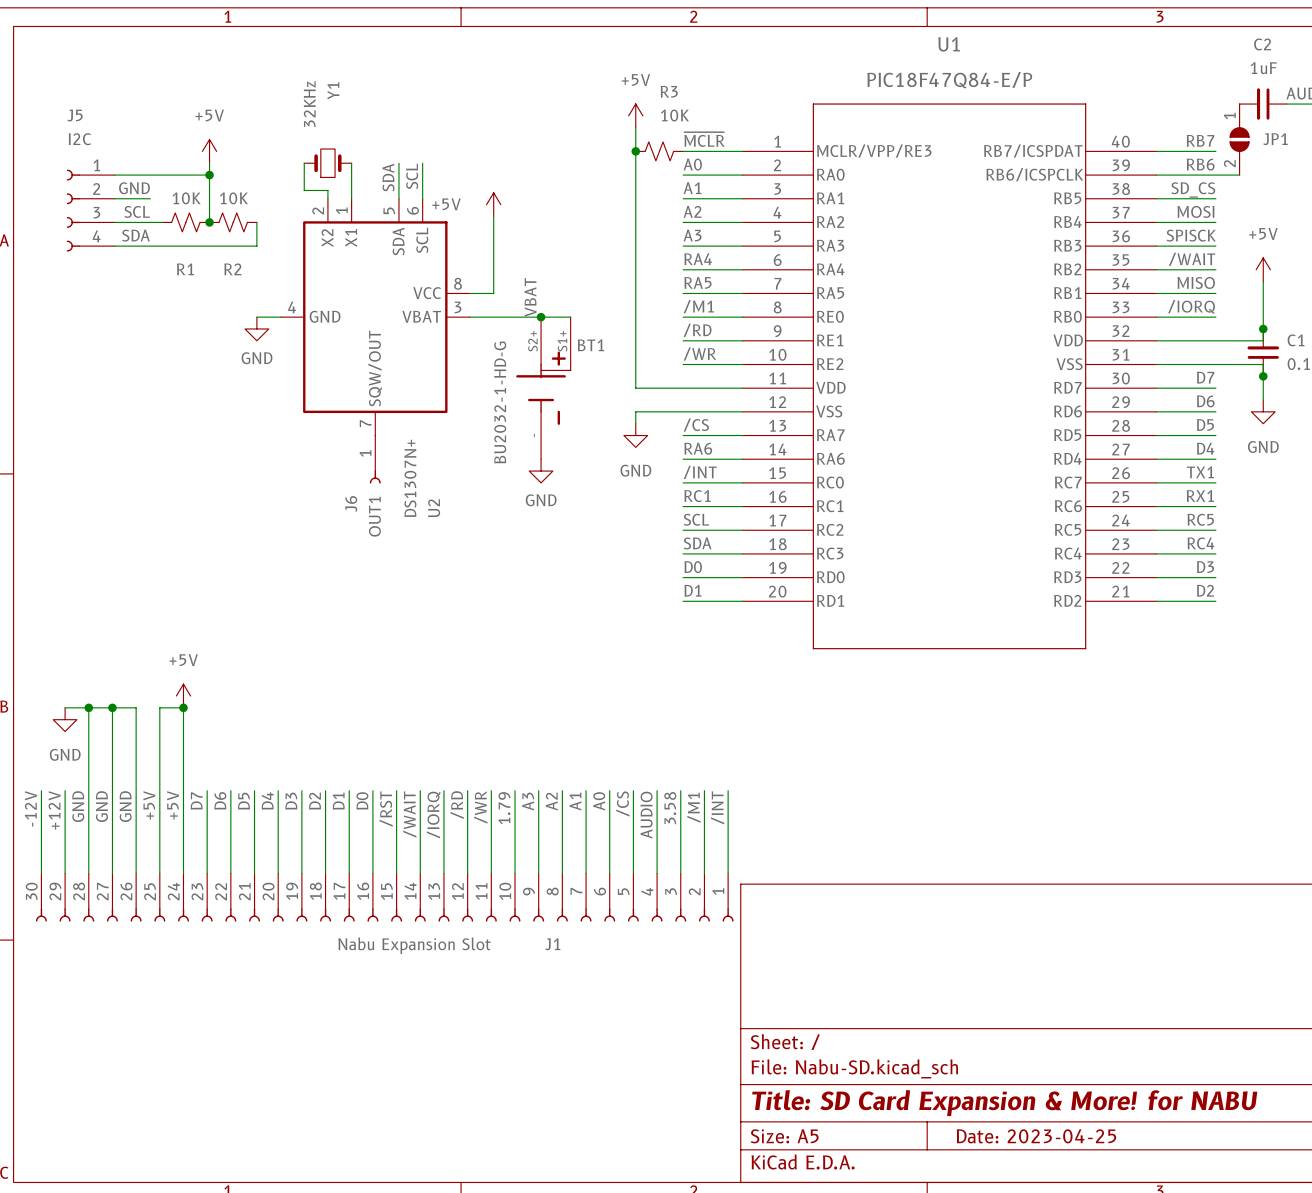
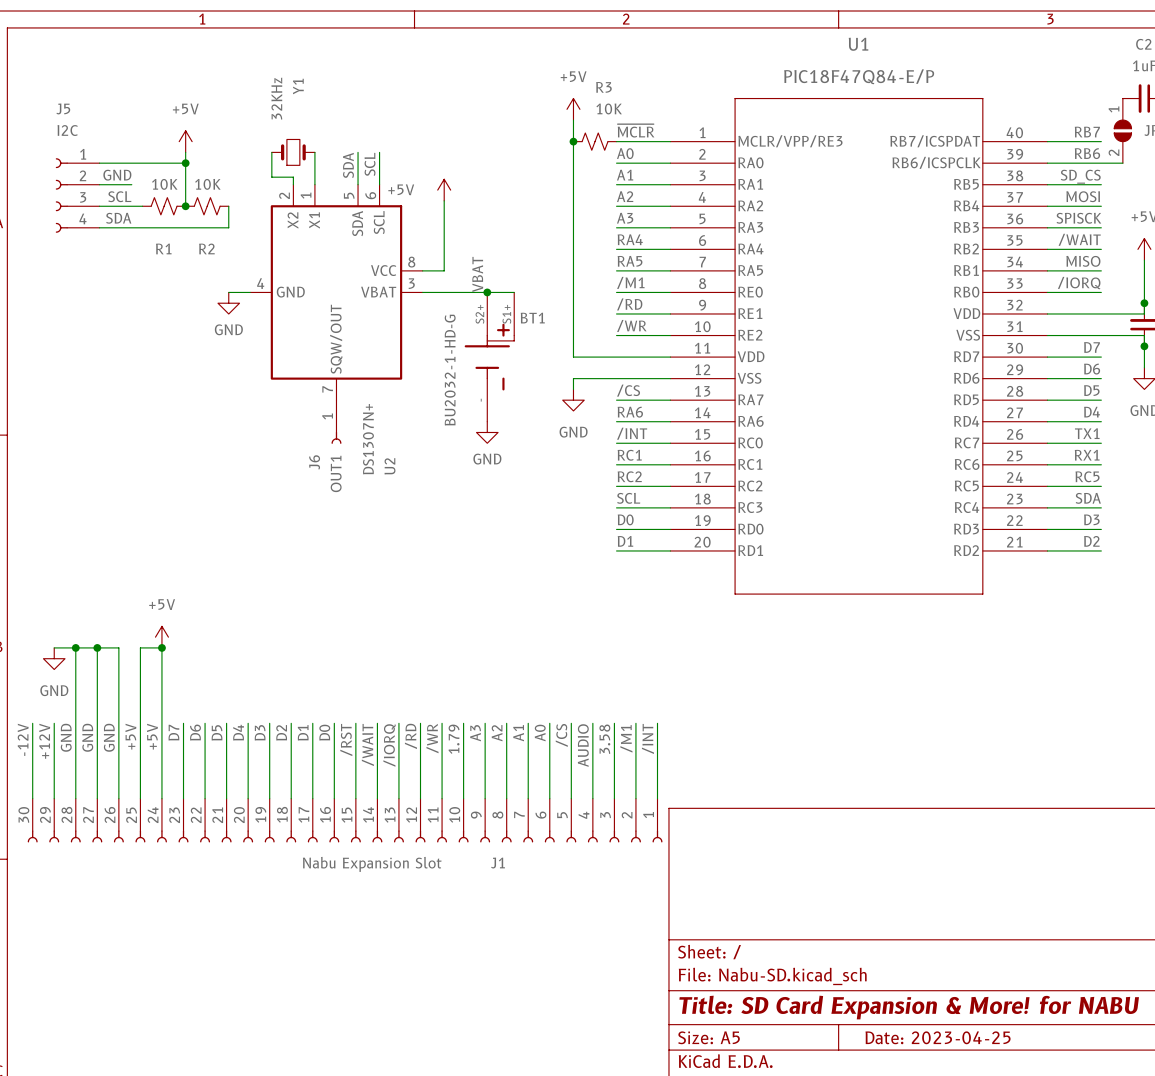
label: SCL (696, 519) -> RC2 (629, 476)
label: SDA (697, 543) -> SCL (628, 498)
label: RC4 (1200, 543) -> SDA (1088, 498)

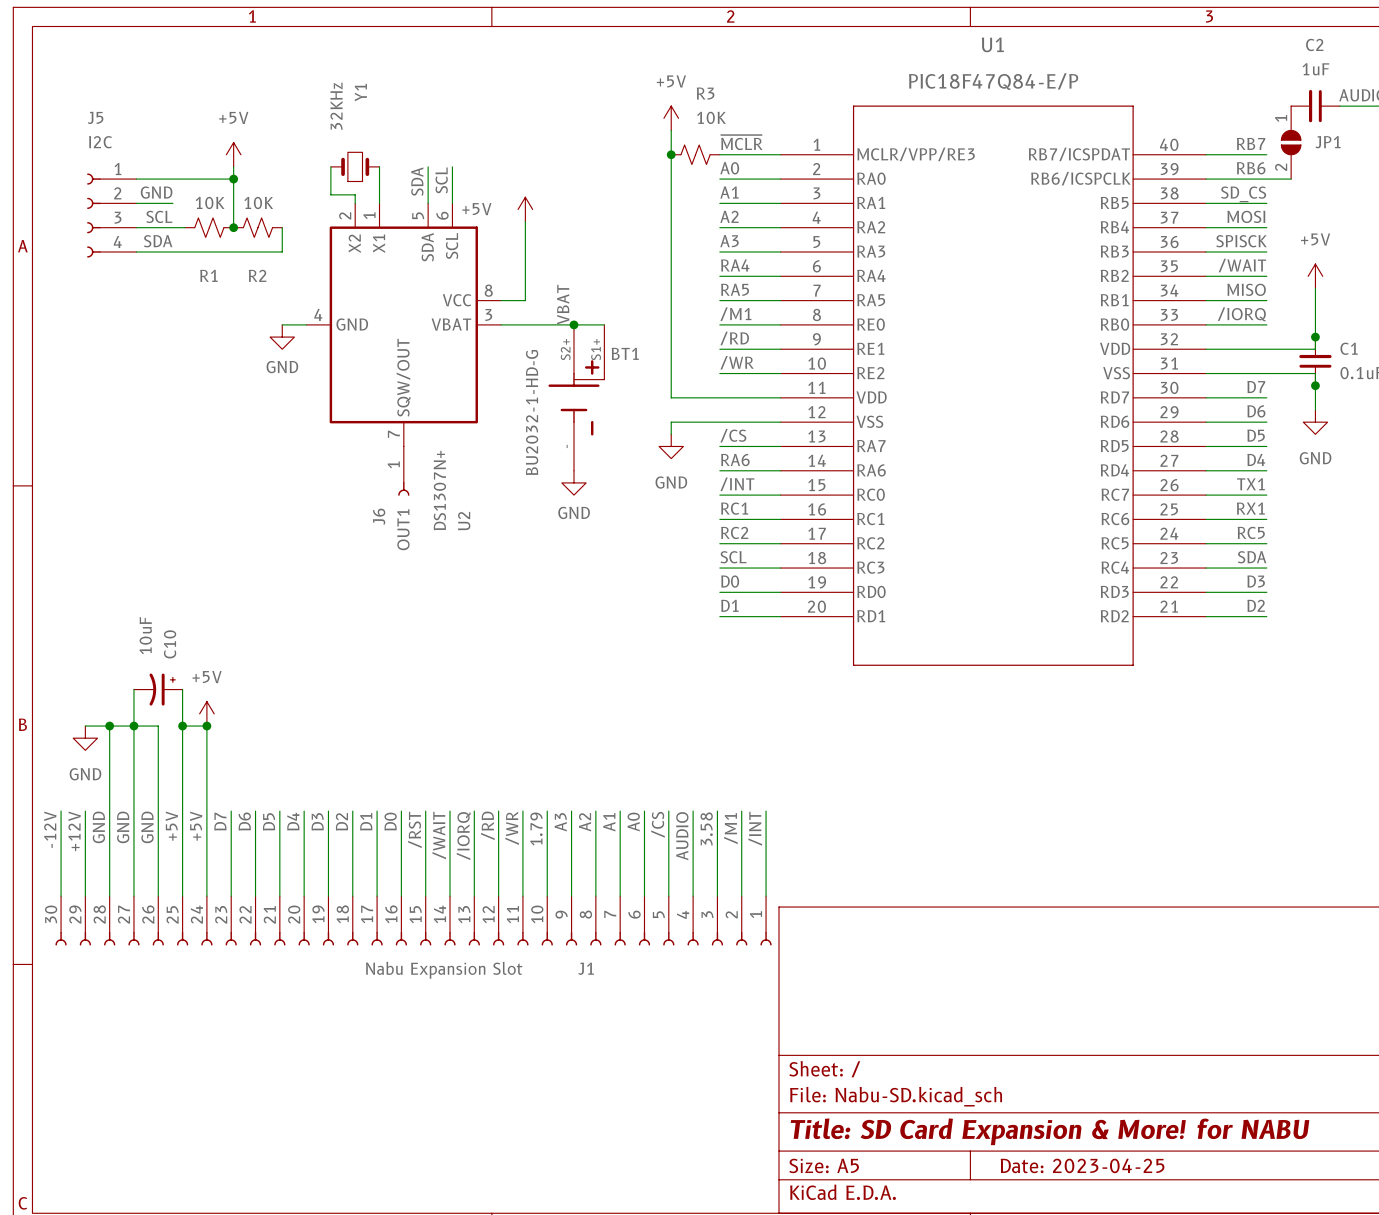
wire: none -> (133, 689) (133, 726)
C10: none -> 10uF (158, 689)
wire: none -> (182, 689) (182, 726)
junction: none -> (182, 726)

